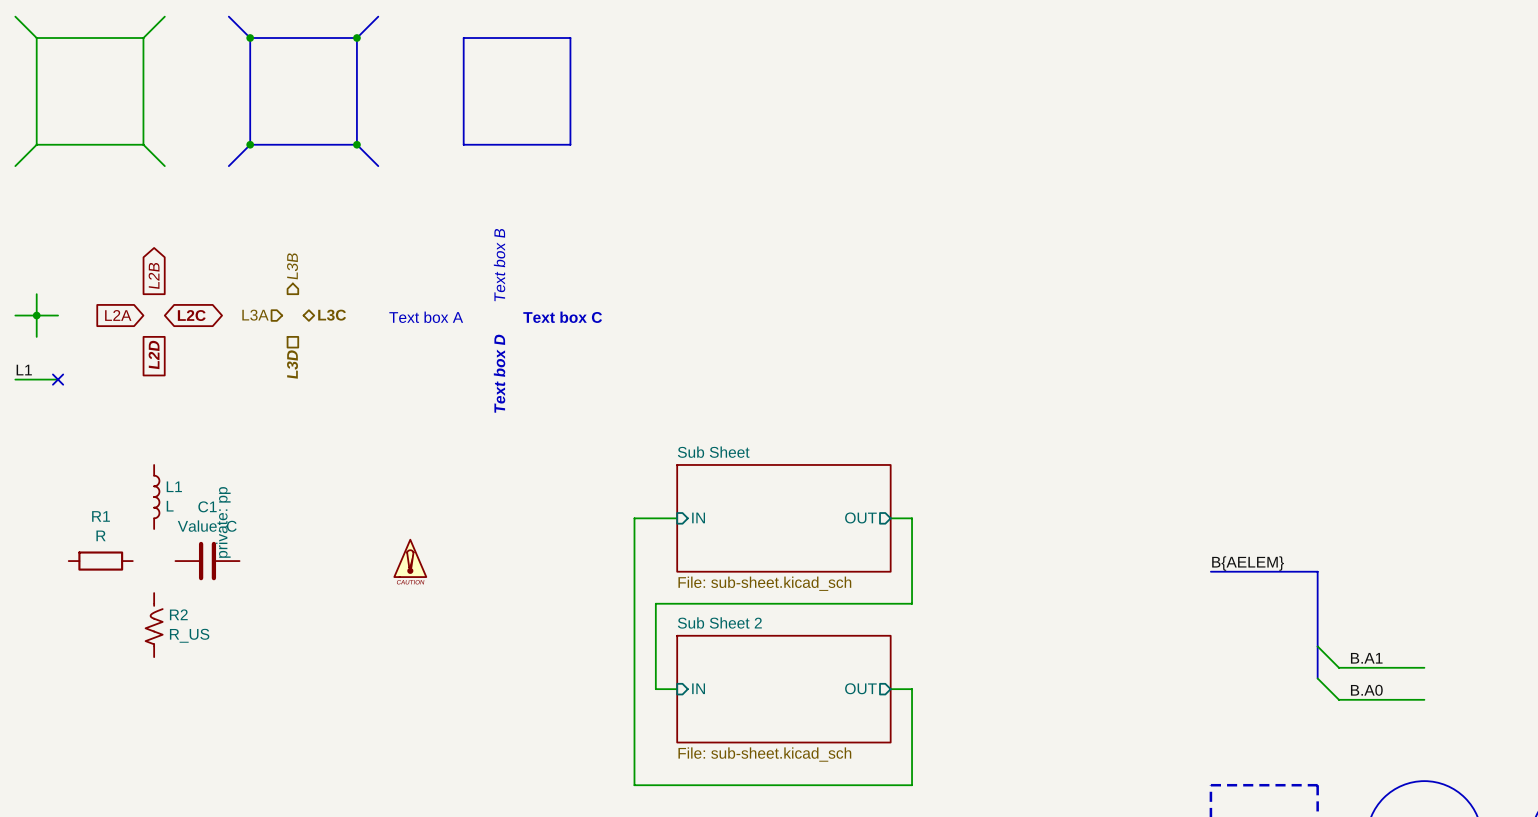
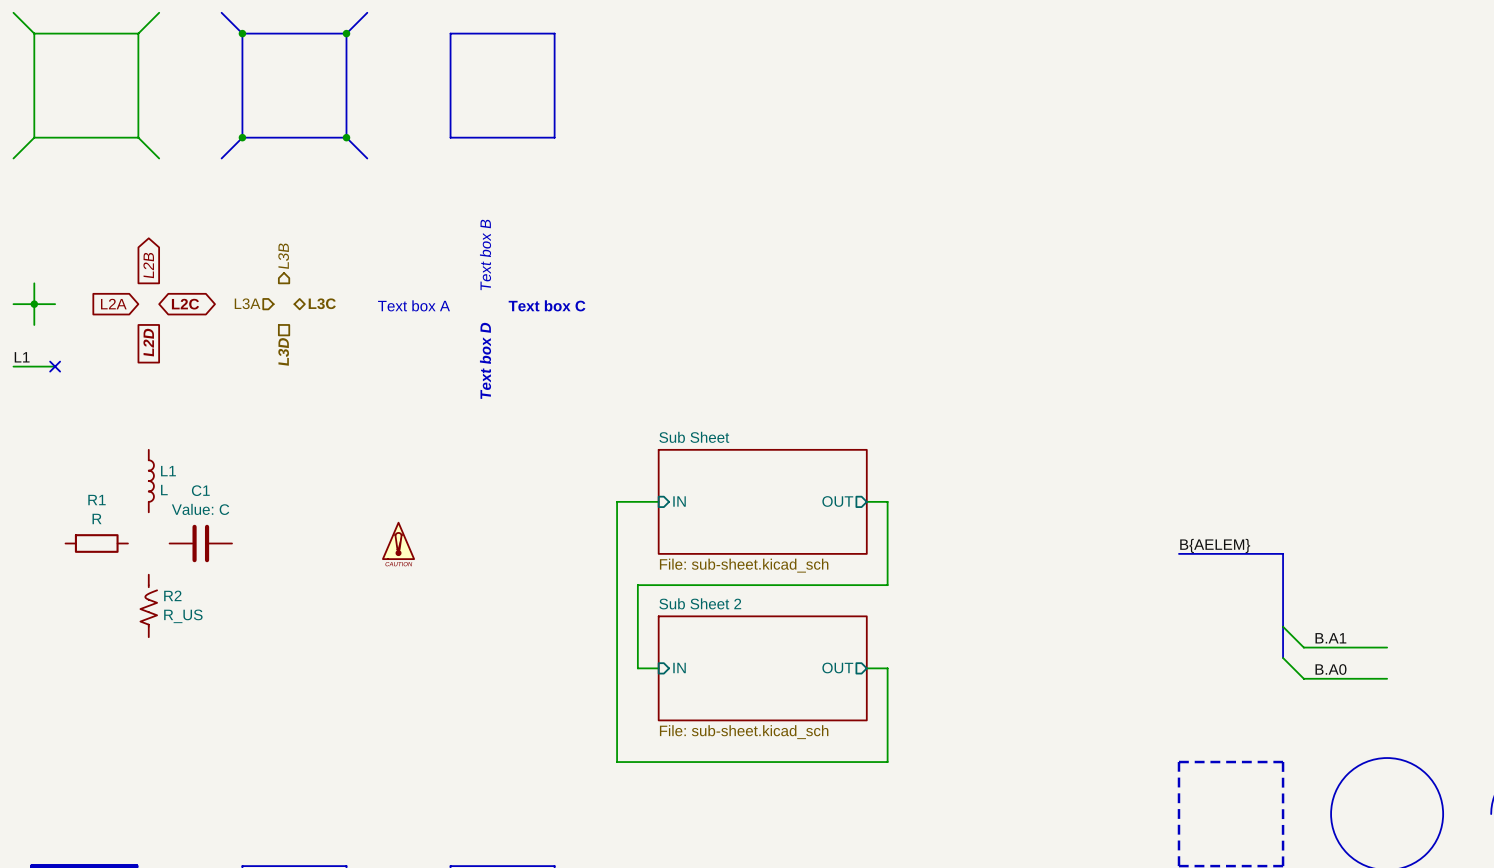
C1 text: private: pp (223, 522) -> none

